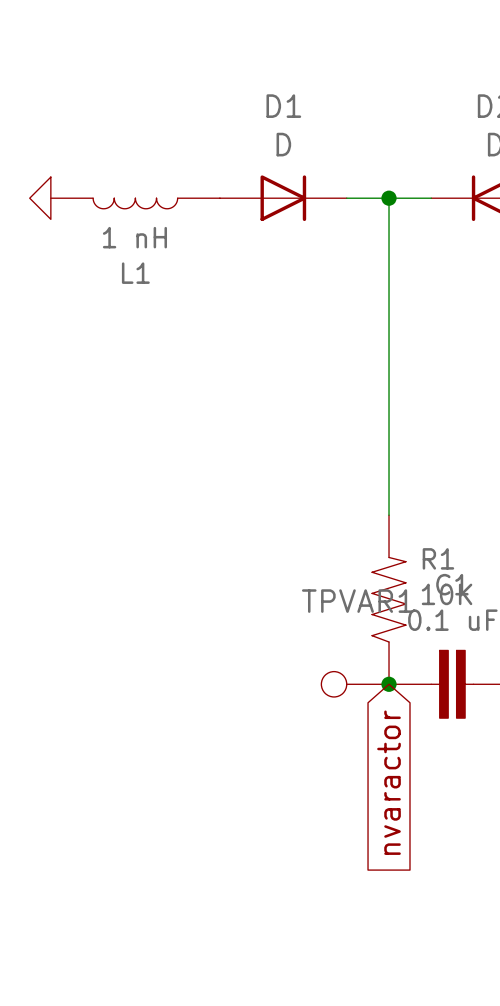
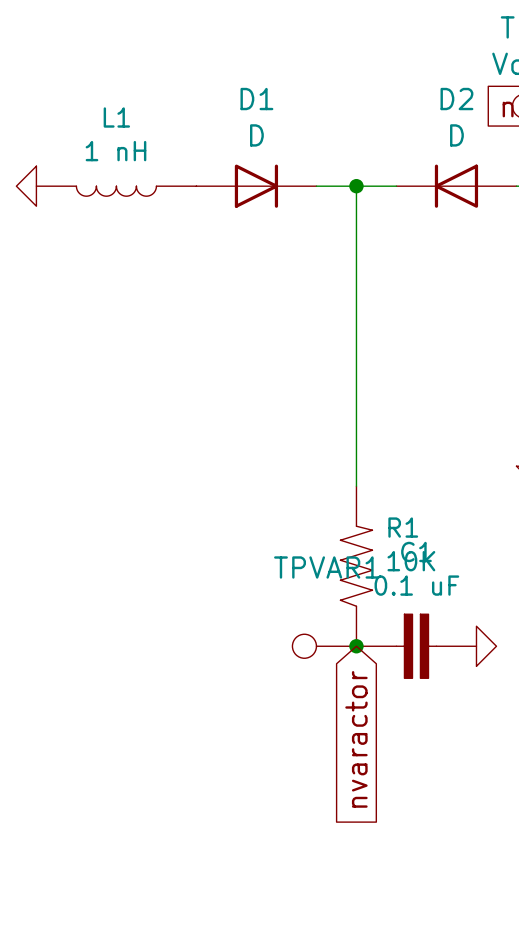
L1 value position: 1 nH (134, 237) -> 1 nH (115, 151)
L1 name position: L1 (135, 273) -> L1 (116, 117)

